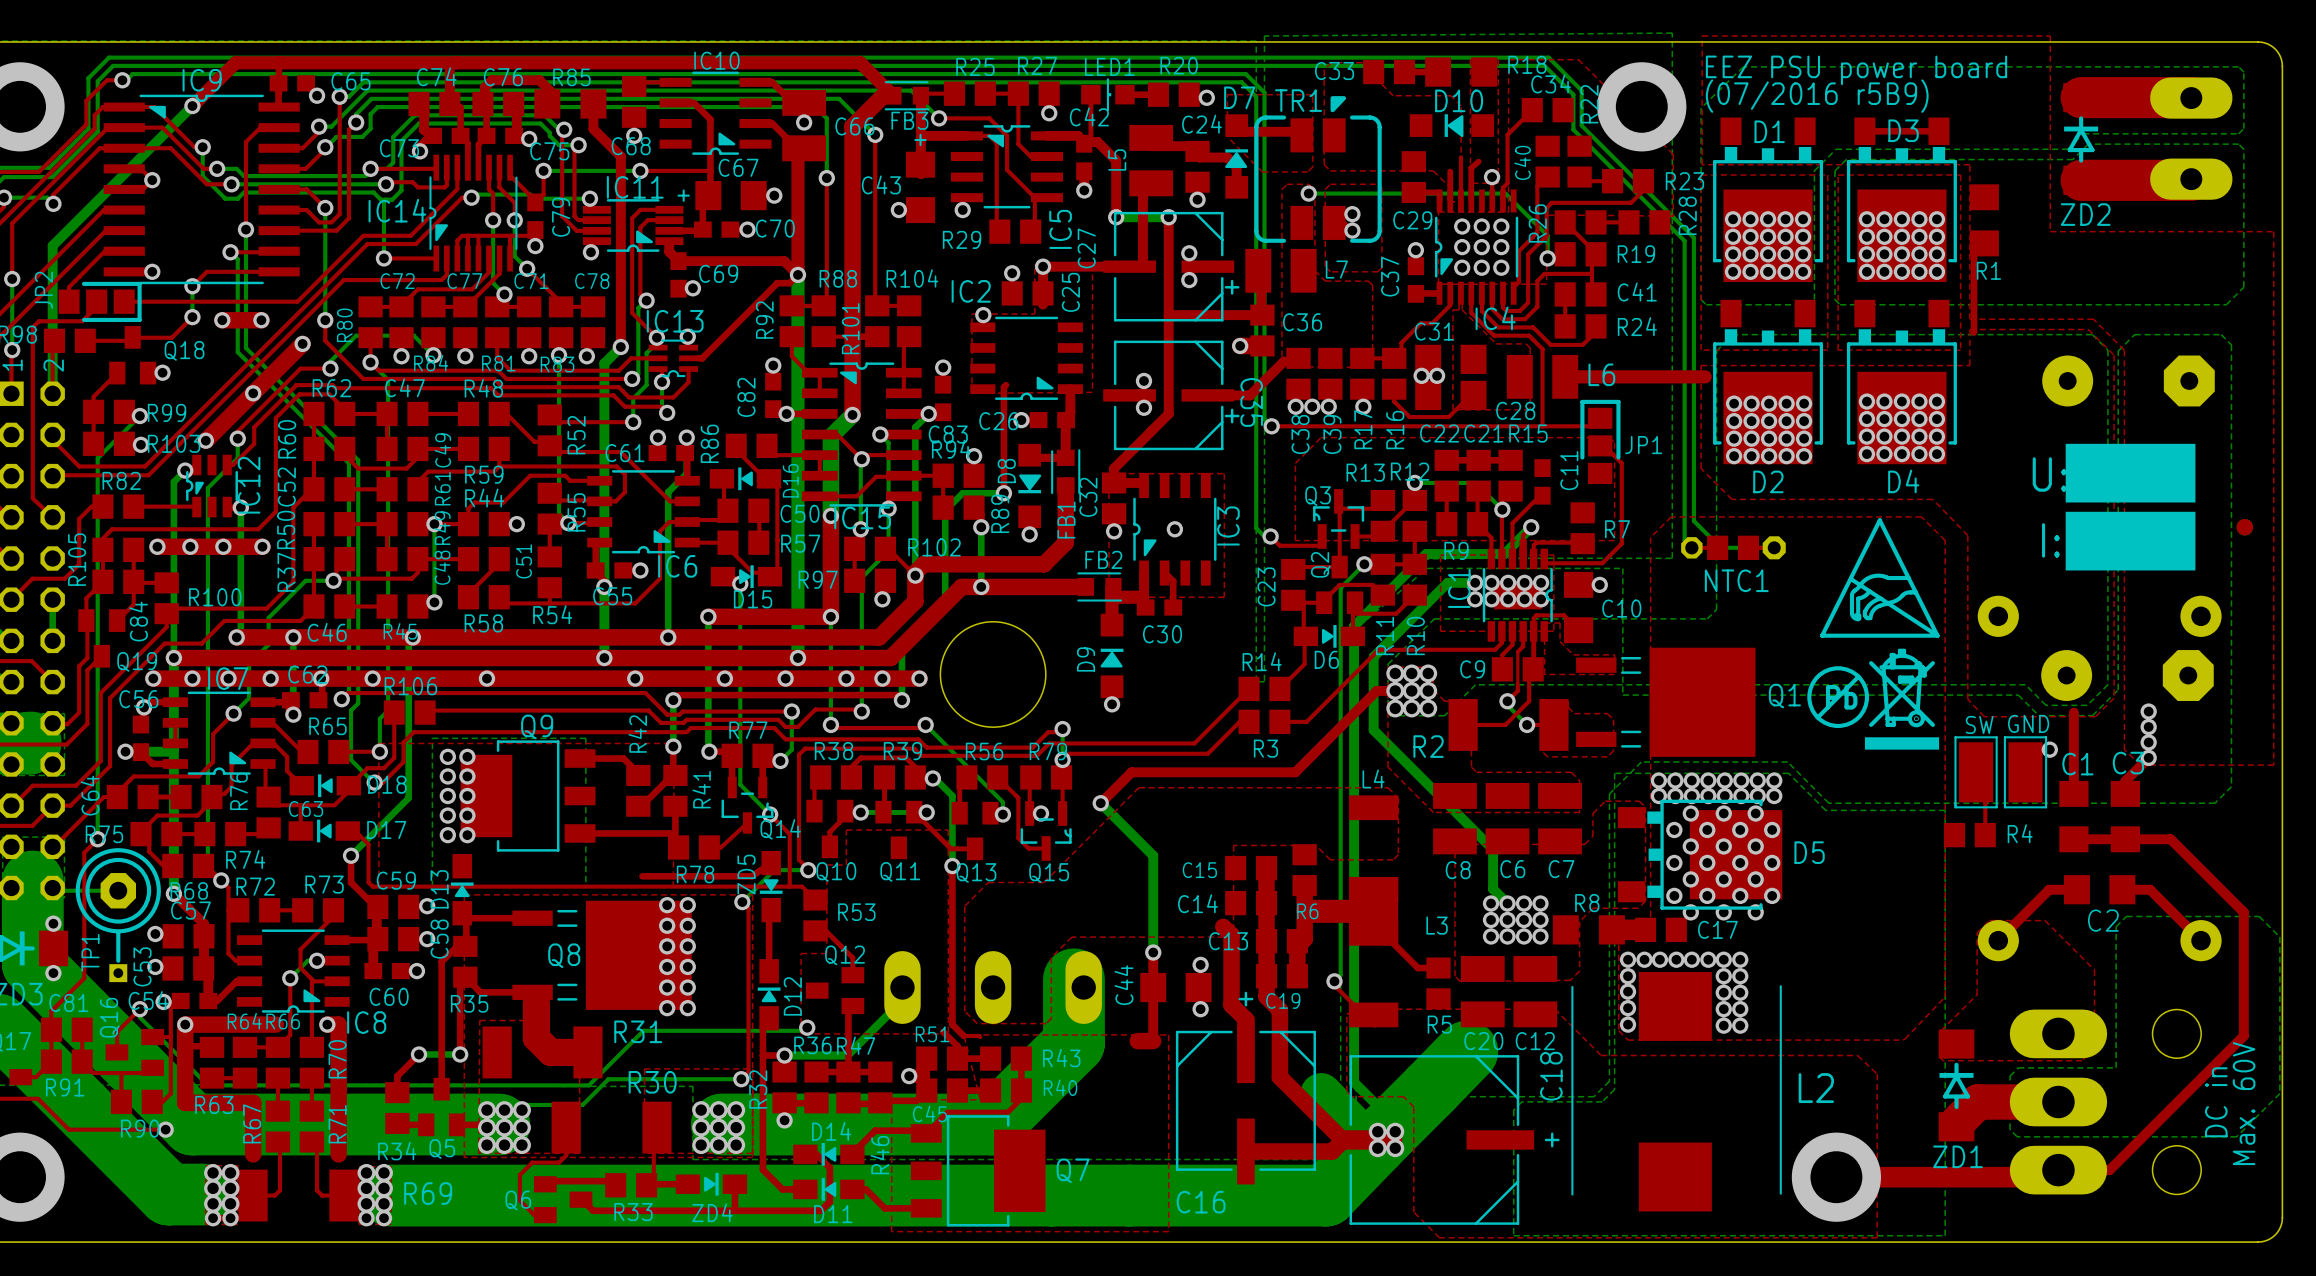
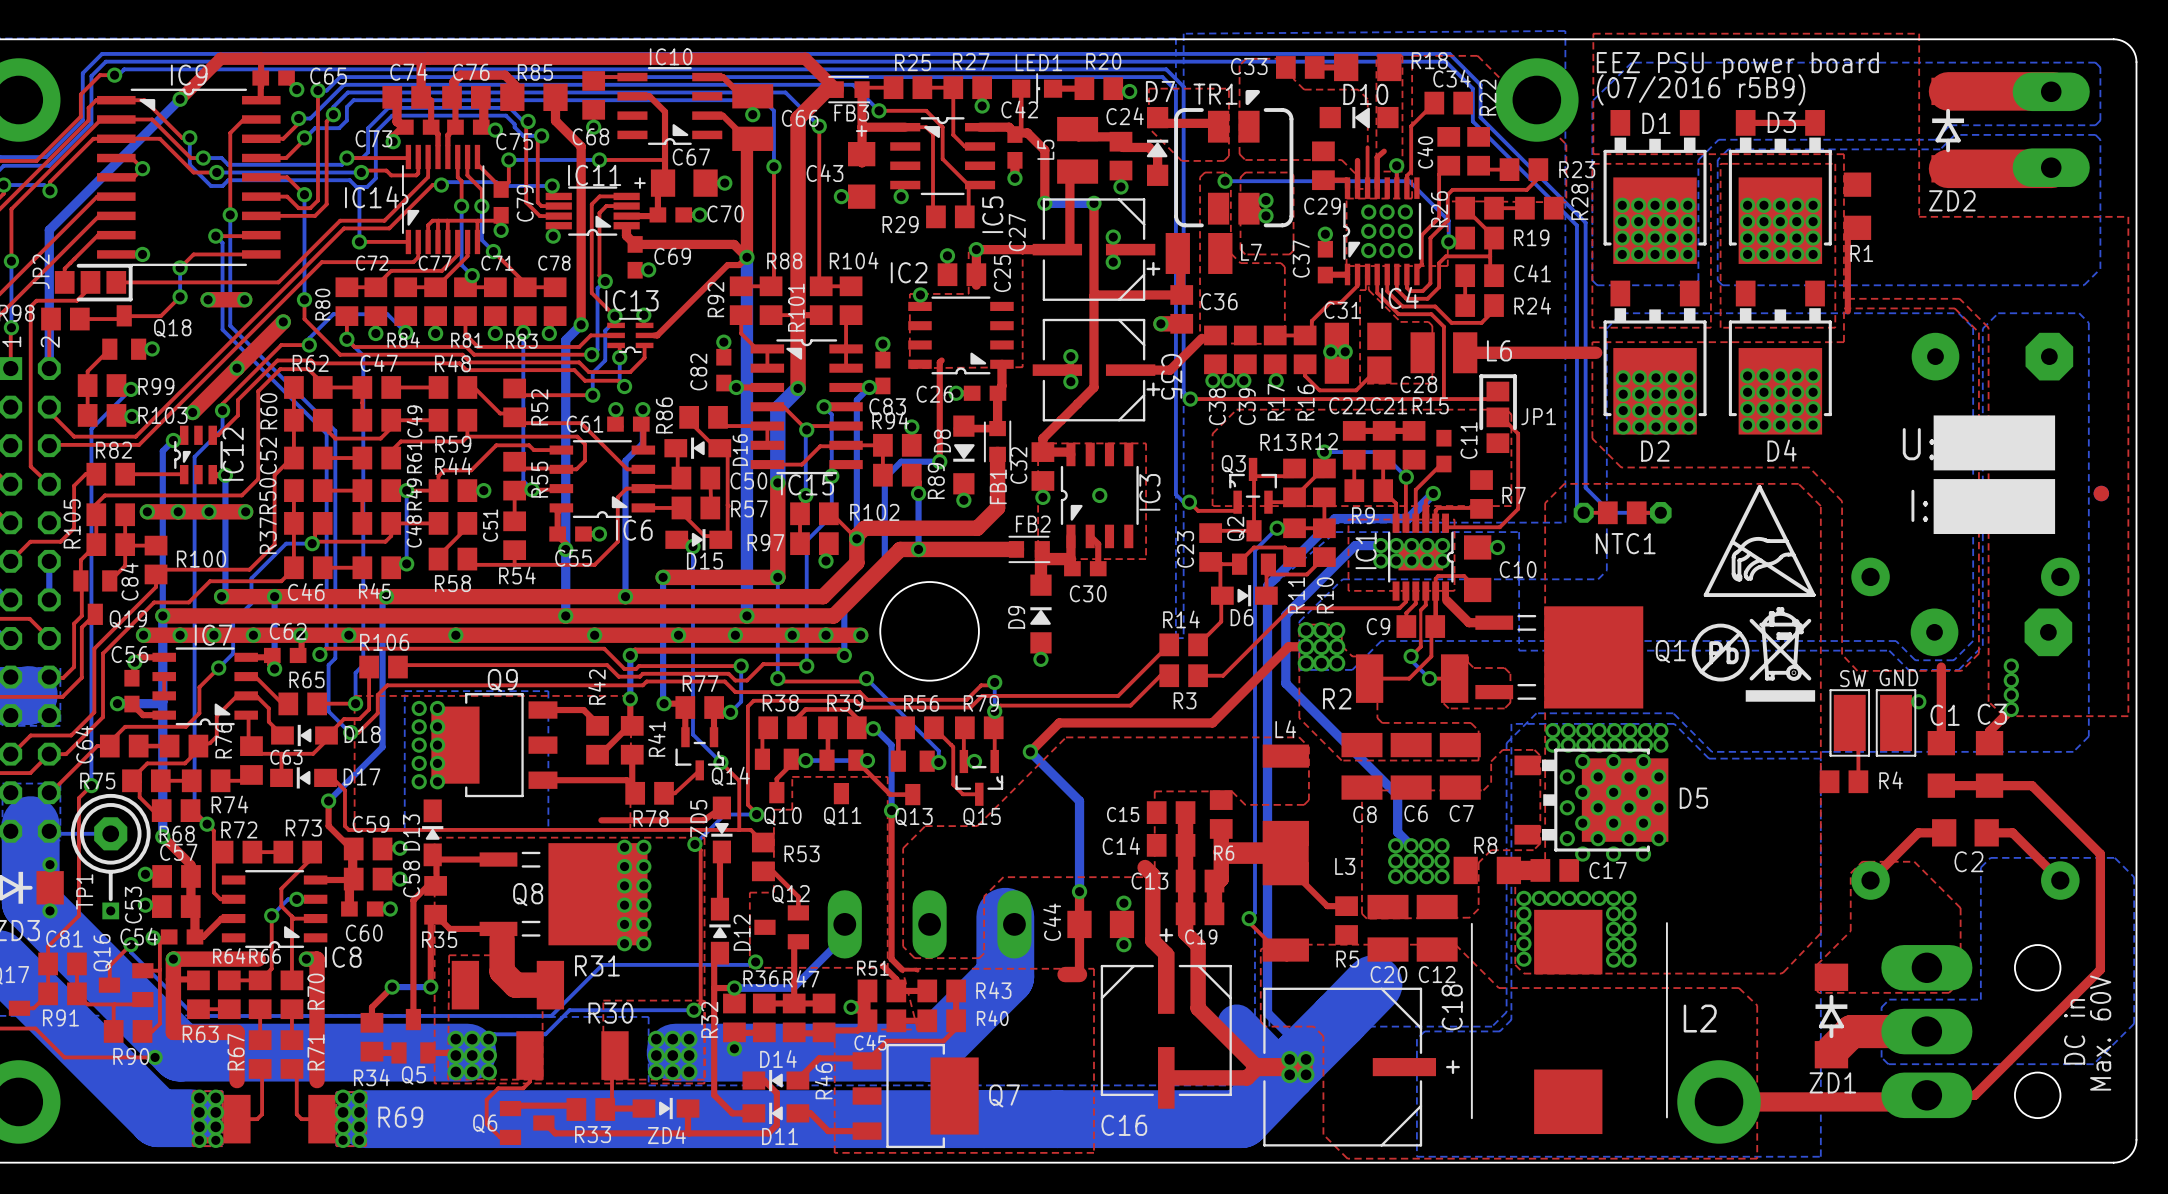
top zone outline: (1544, 622) (1560, 622) (1560, 641) (1573, 654) (1614, 654) (1614, 674) (1544, 674) (1544, 622) -> none
top track: none -> (1446, 600) (1468, 622) (1494, 622)

